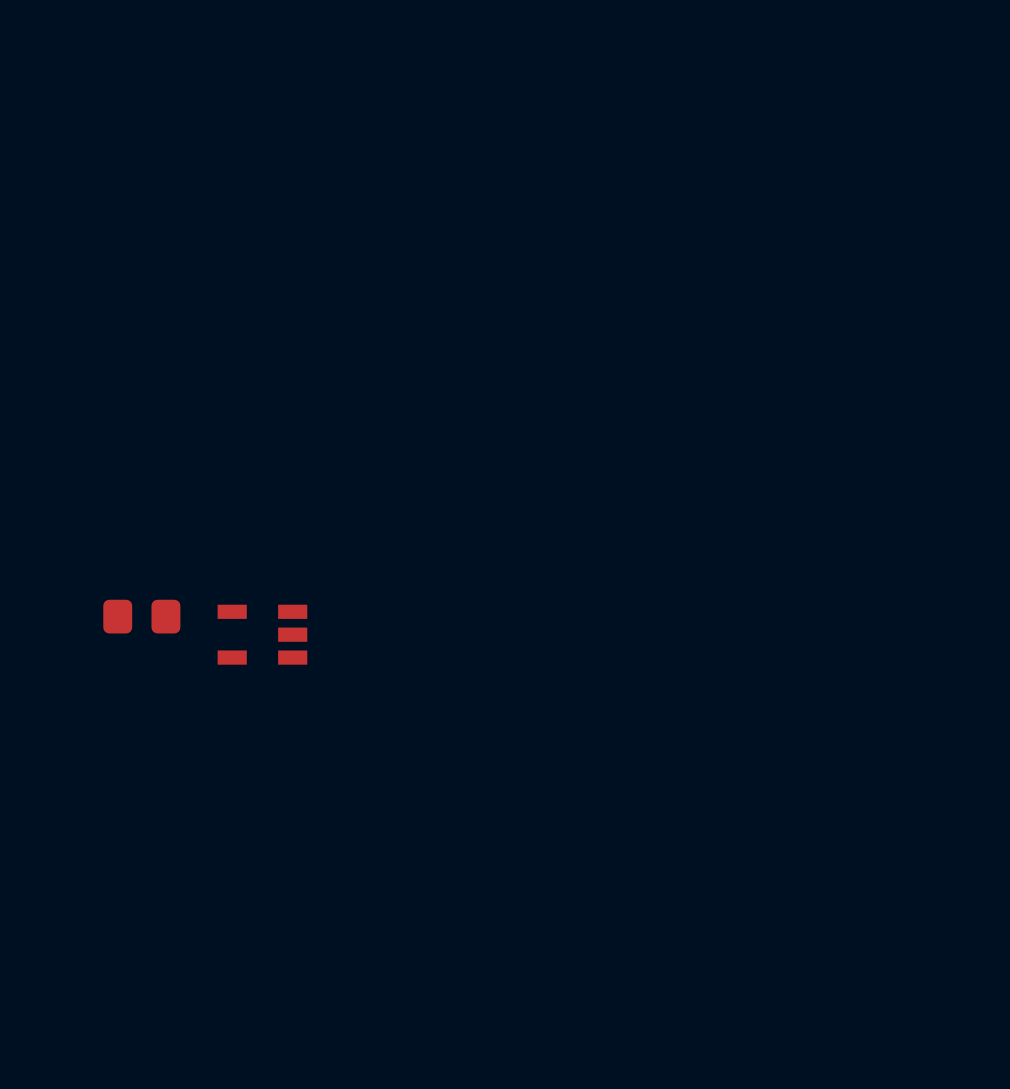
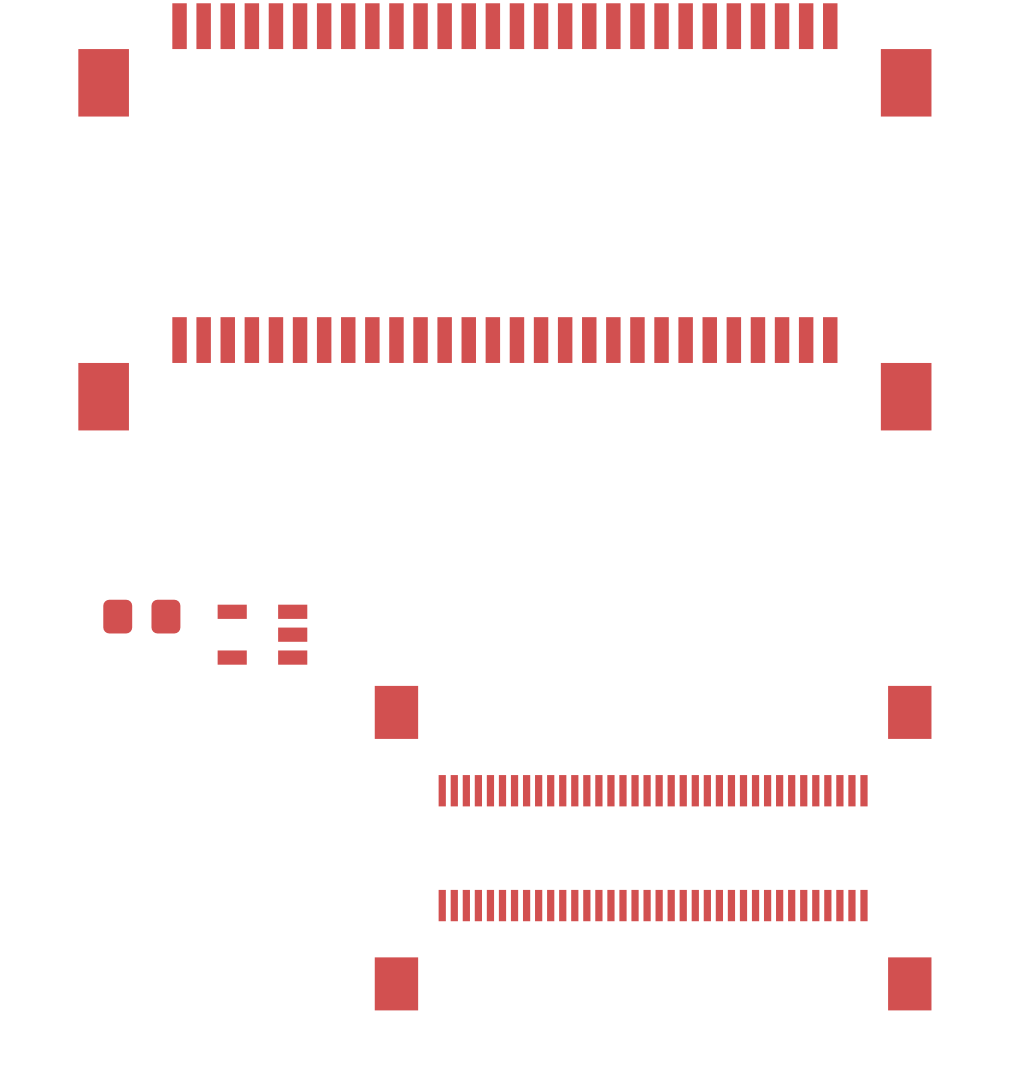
part: none -> (504, 59)
part: none -> (504, 373)
part: none -> (653, 746)
part: none -> (653, 950)

